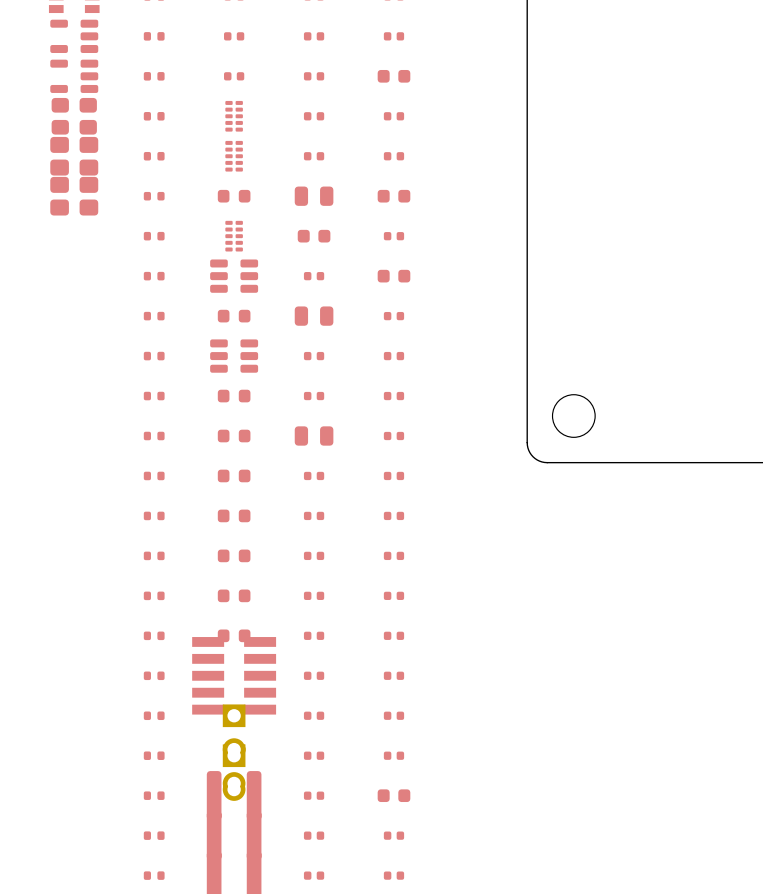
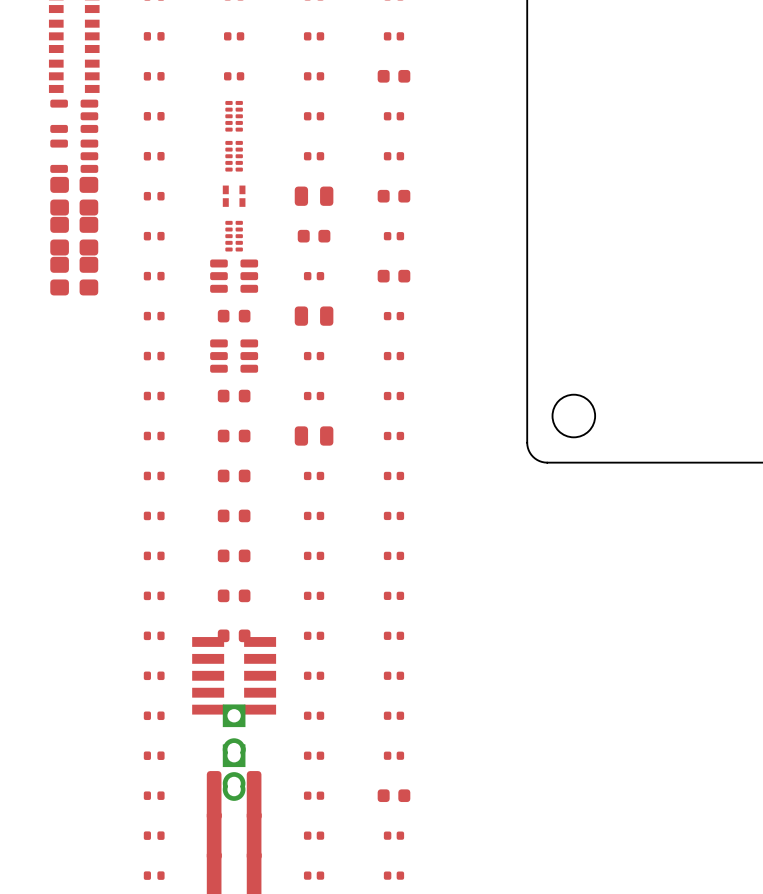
part footprint: [50, 19, 99, 53] -> [48, 19, 100, 53]
part footprint: [50, 59, 99, 93] -> [48, 59, 100, 93]
part footprint: [51, 97, 97, 135] -> [50, 99, 99, 133]
part footprint: [50, 136, 99, 176] -> [50, 139, 99, 173]
part footprint: [217, 189, 251, 203] -> [222, 185, 246, 207]
part: none -> (74, 236)
part: none -> (74, 276)

